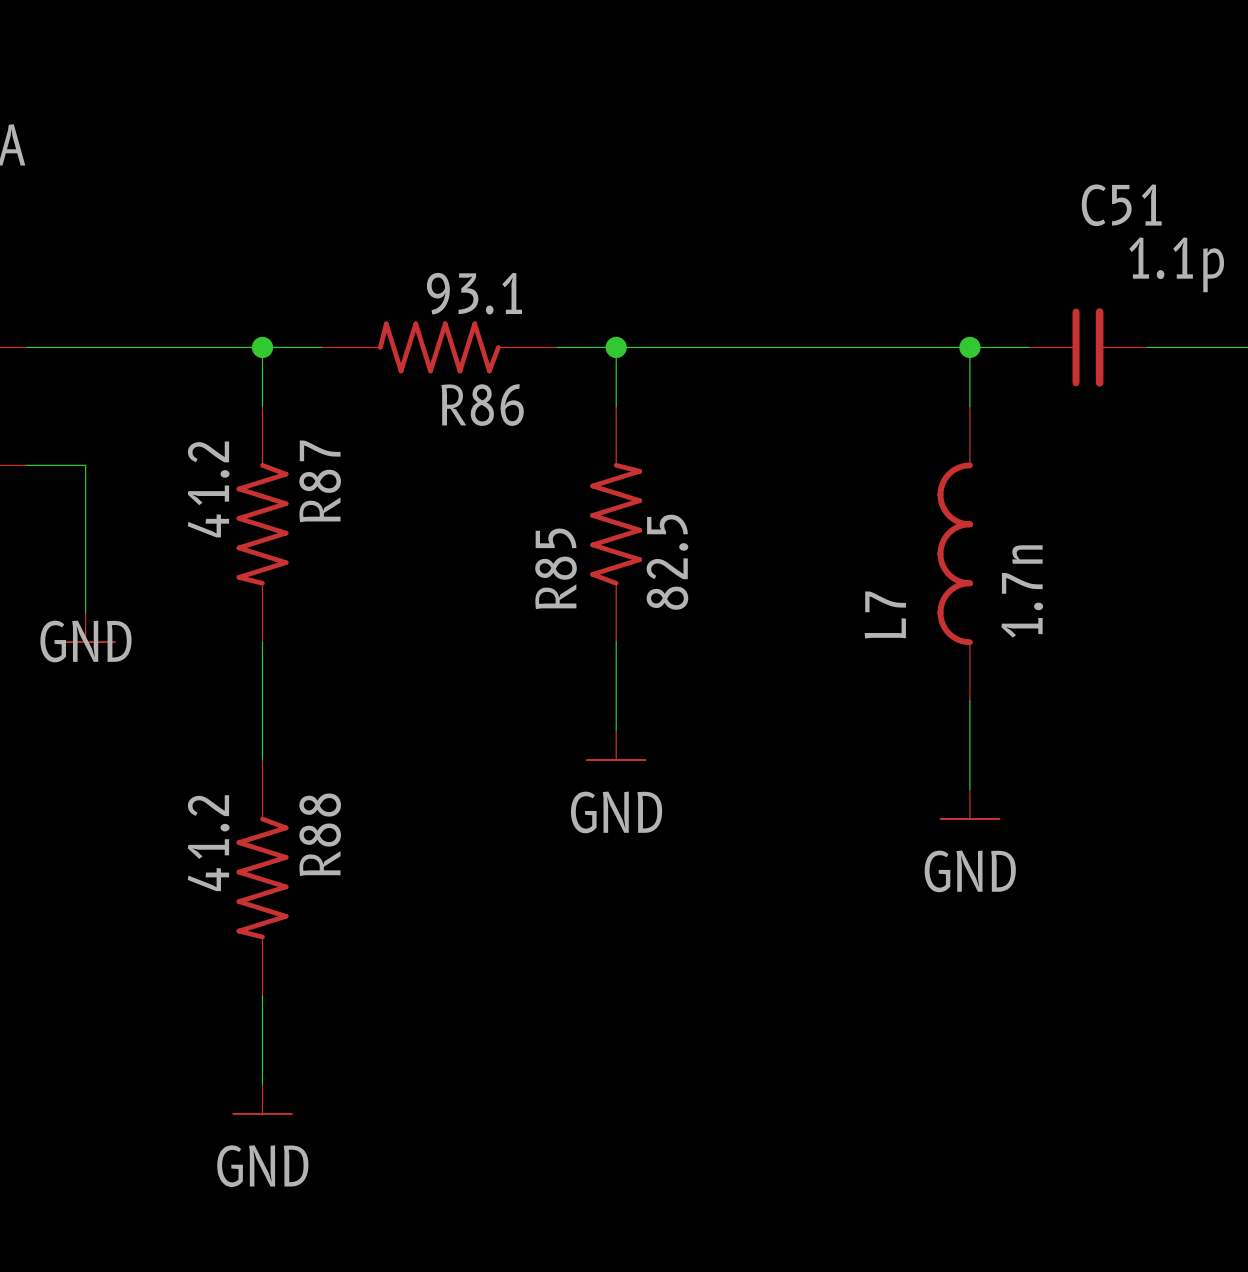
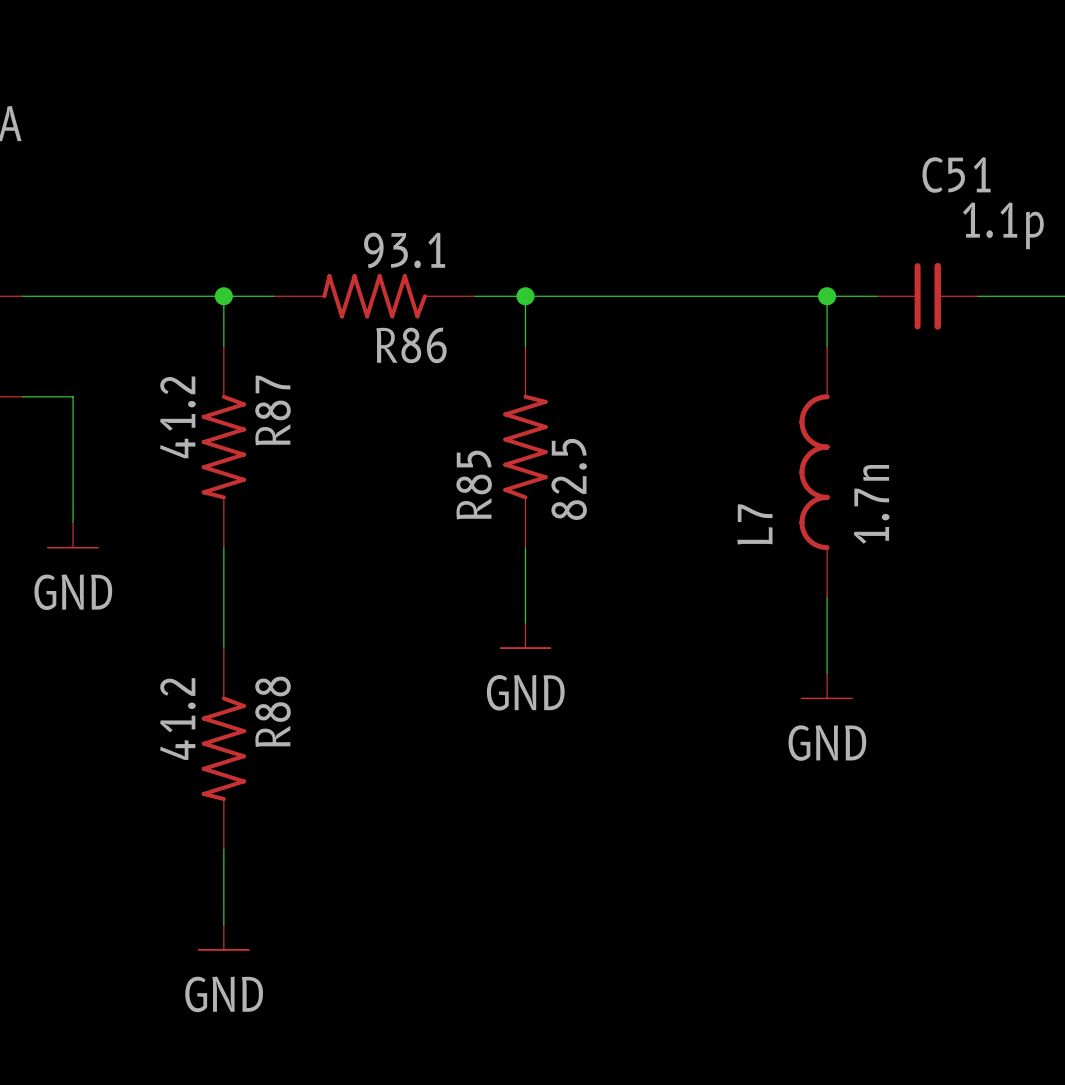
power symbol text position: GND (85, 641) -> GND (73, 592)

